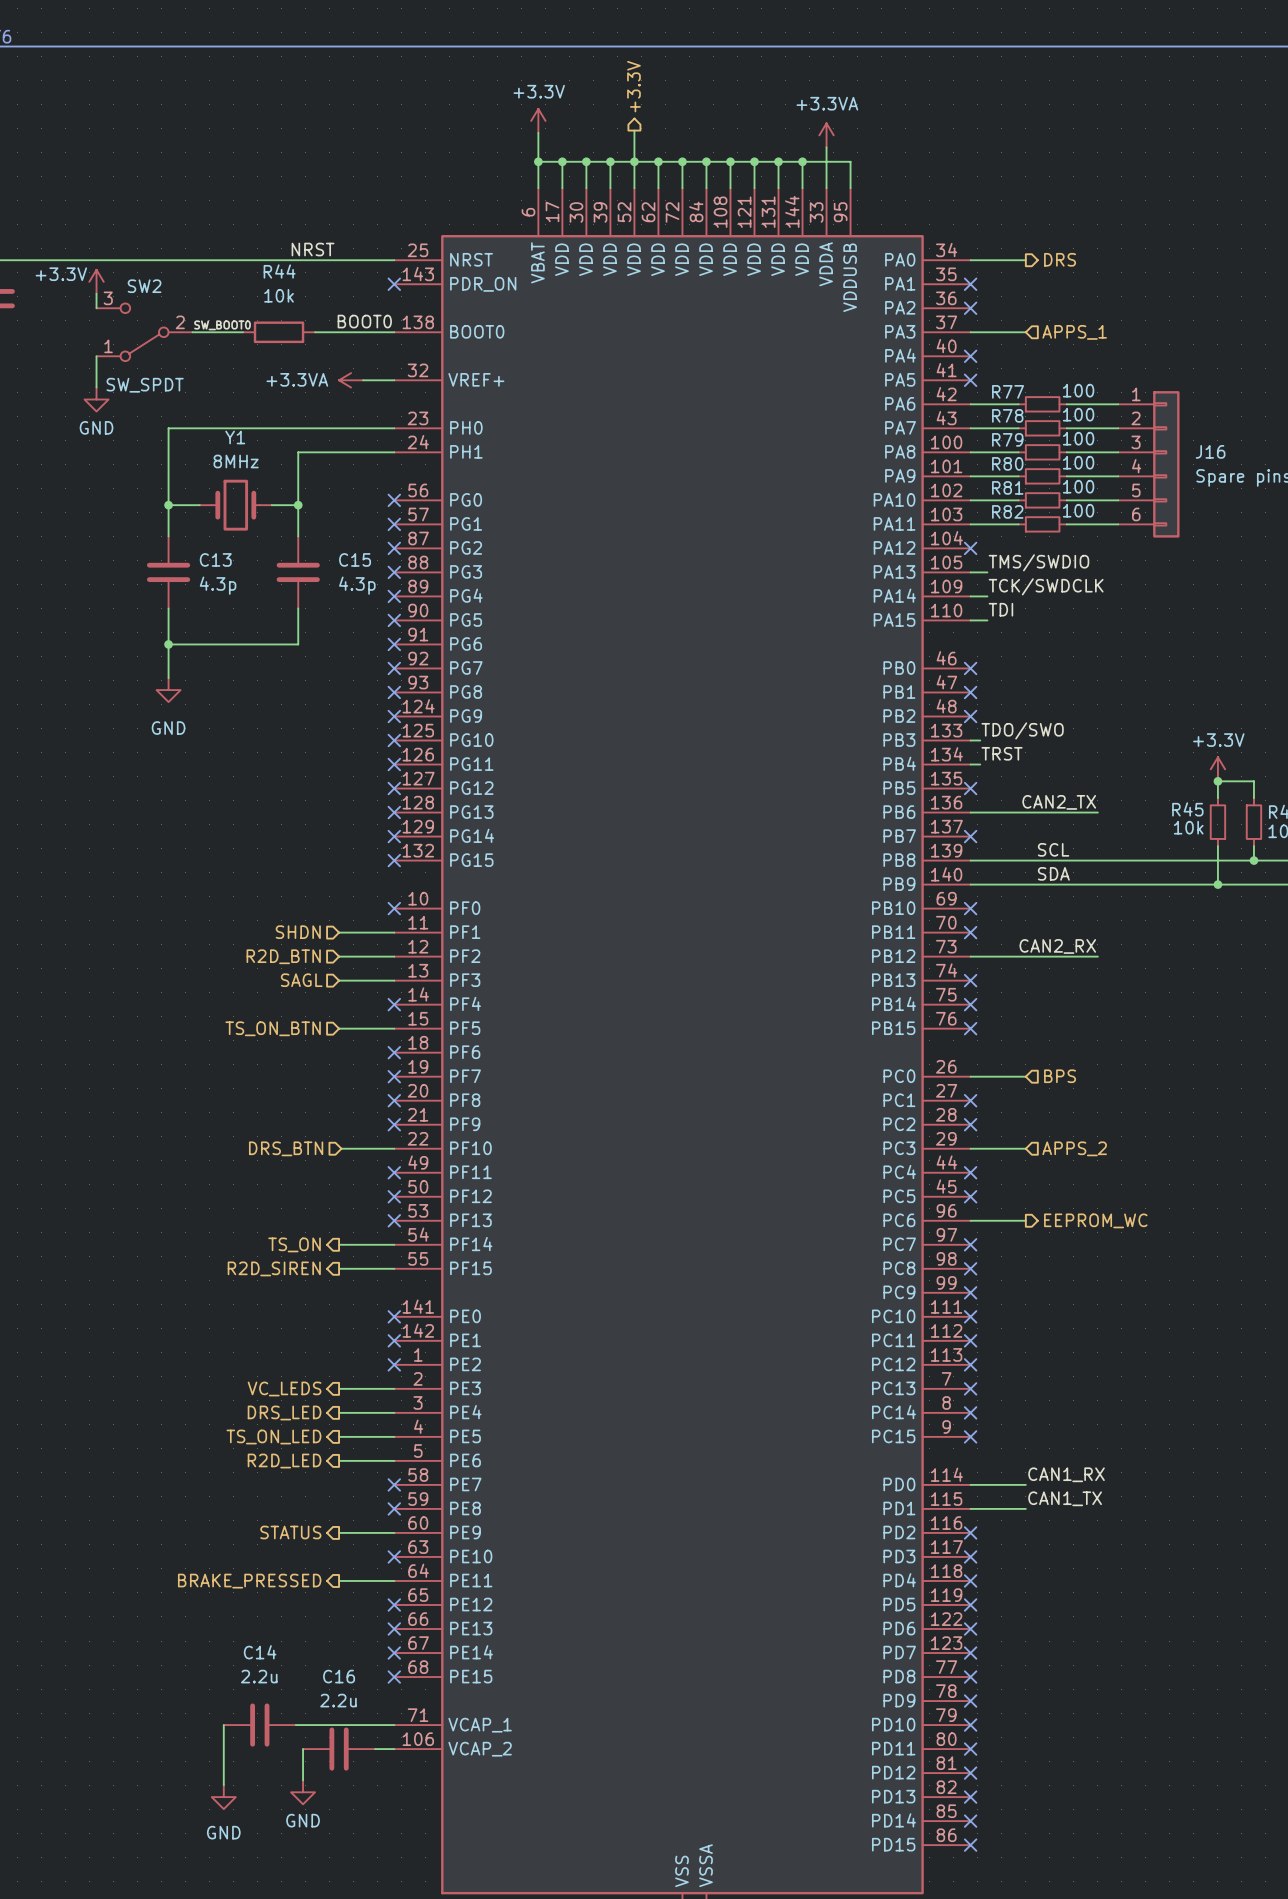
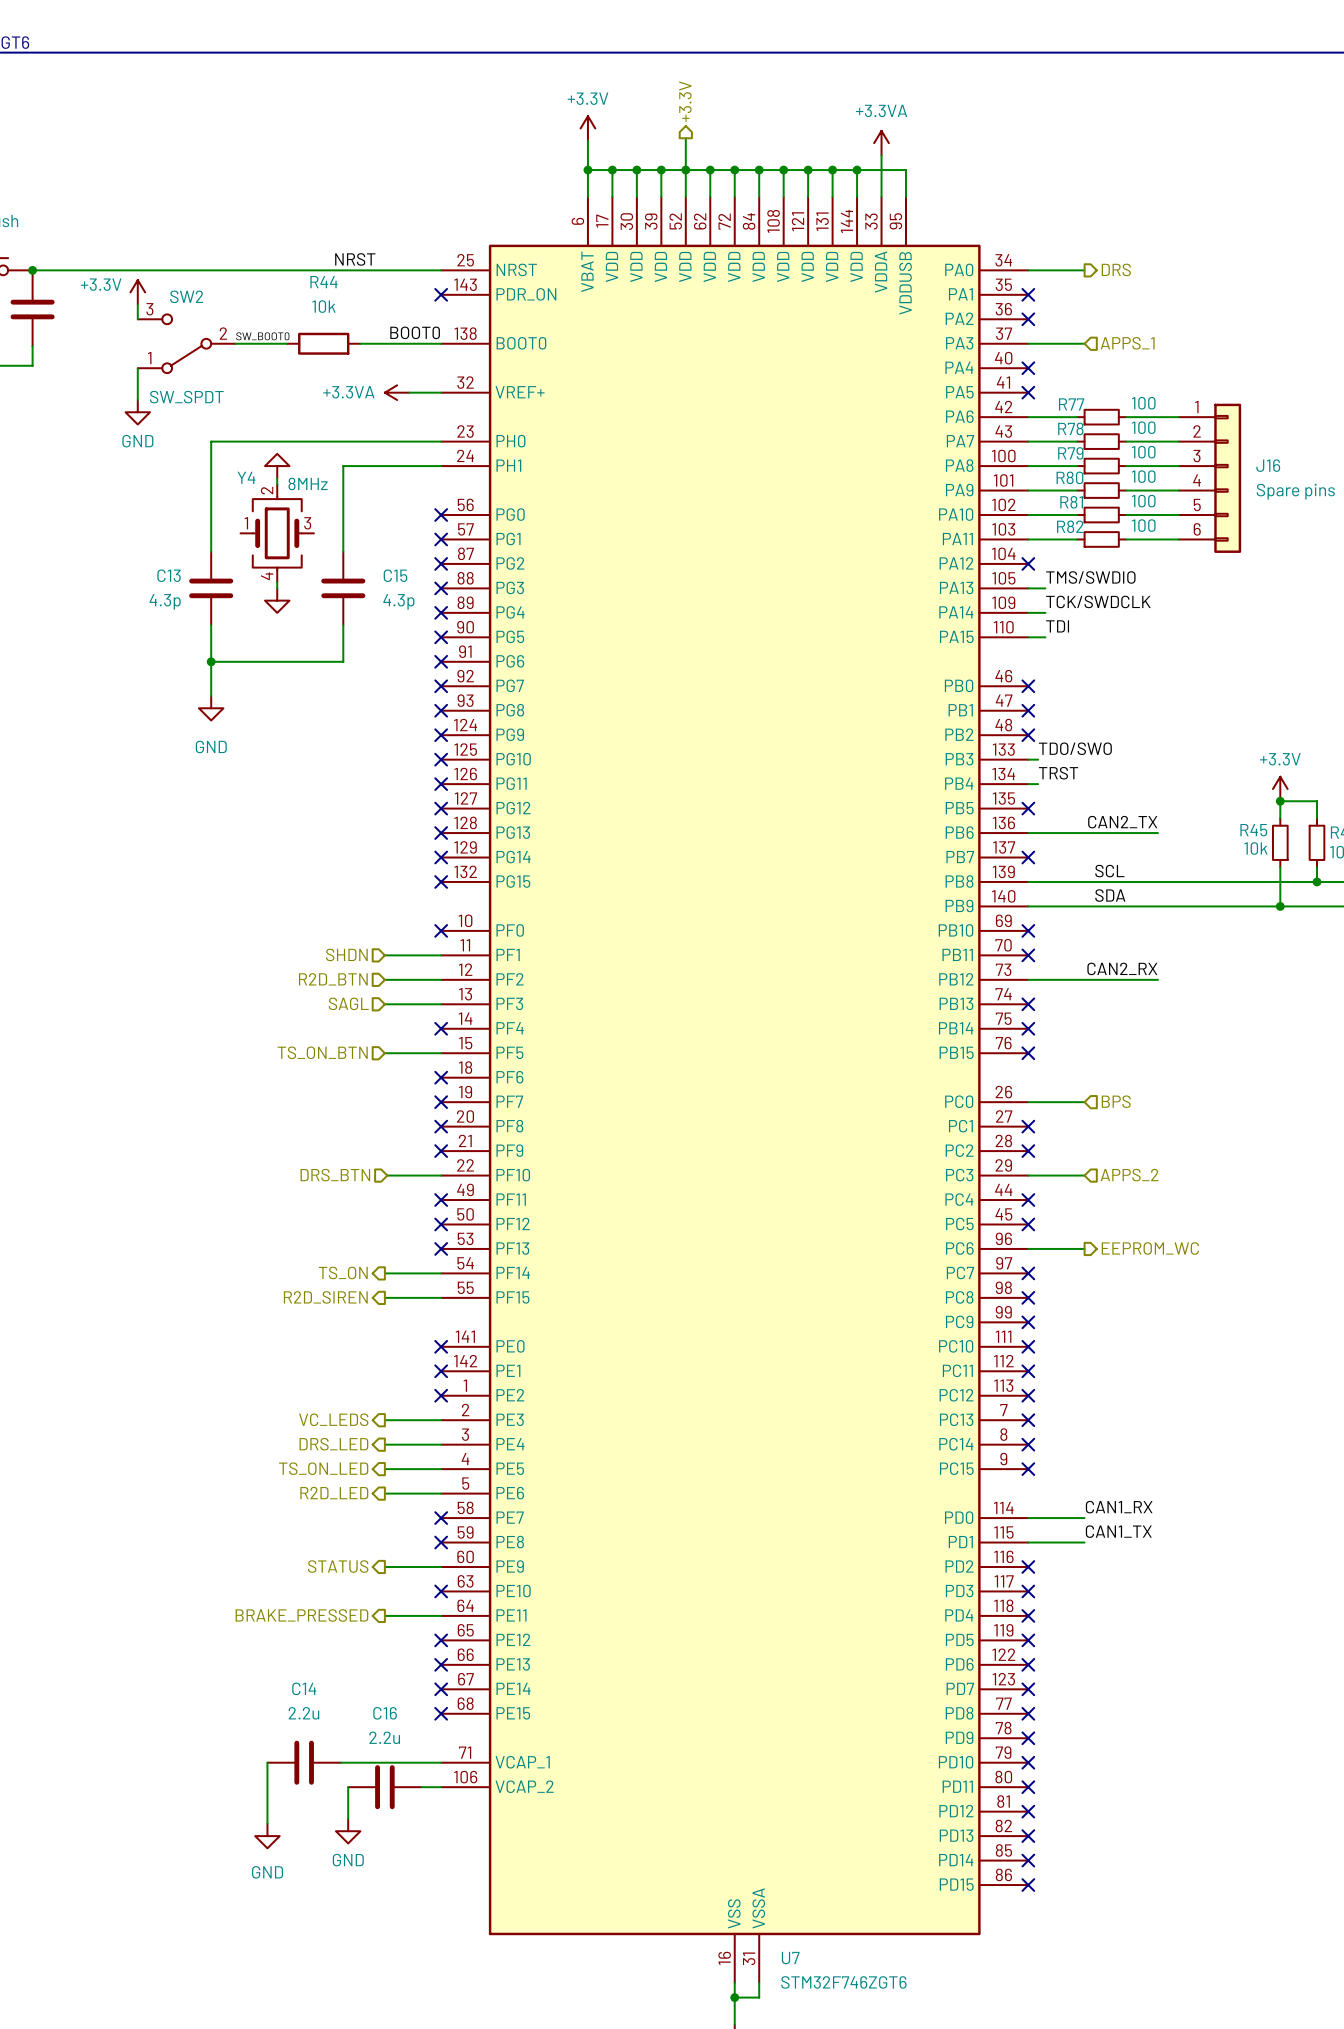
power symbol: none -> (277, 466)
wire: none -> (277, 478) (277, 484)
wire: (168, 505) (199, 505) -> none
junction: (168, 505) -> none
Y1: 8MHz (235, 505) -> none
wire: (271, 505) (298, 505) -> none
junction: (298, 505) -> none
Y4: none -> 8MHz (277, 533)
C13 name position: C13 (215, 559) -> C13 (169, 575)
wire: none -> (277, 582) (277, 588)
power symbol: none -> (277, 600)
C13 value position: 4.3p (218, 585) -> 4.3p (165, 601)

